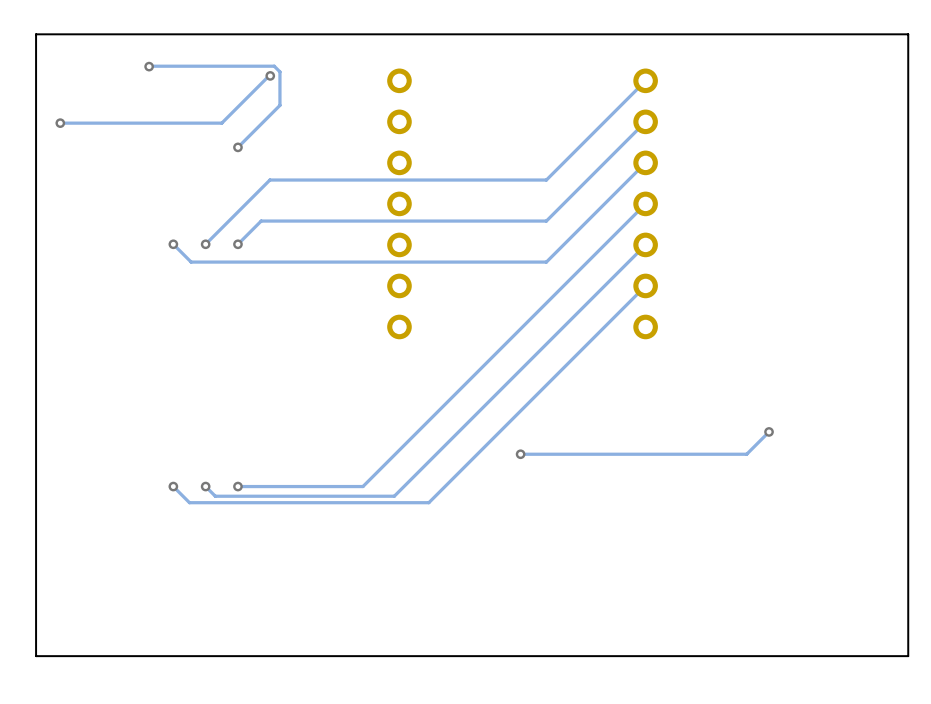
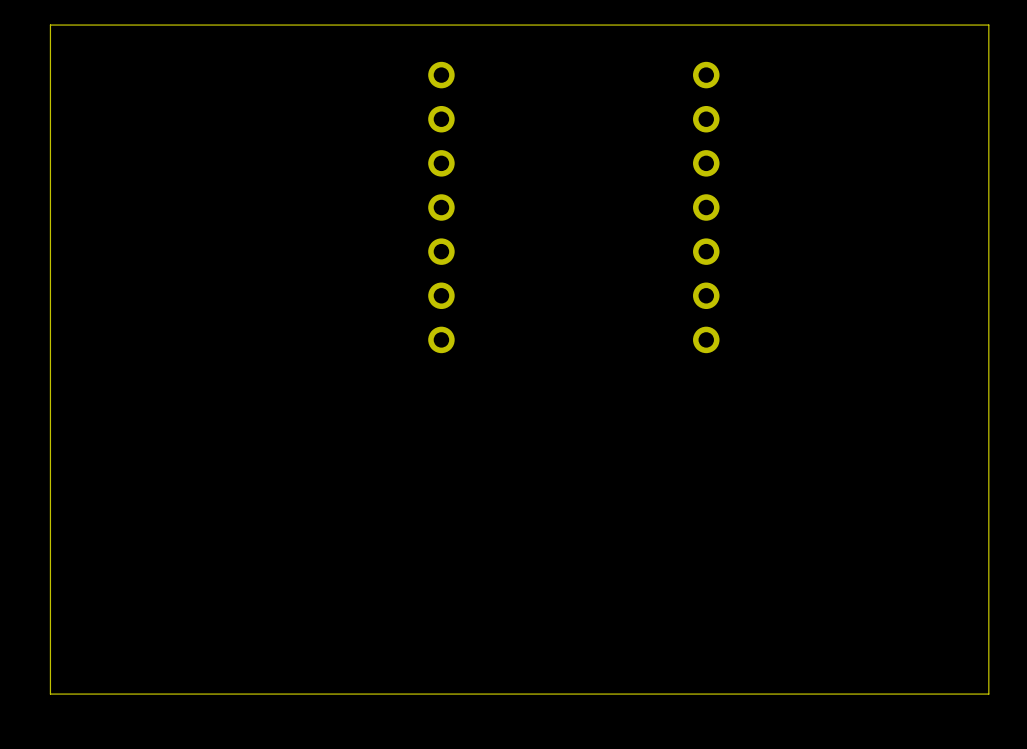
track: (149, 66) (274, 66) (279, 71) (279, 105) (237, 147) -> none
via: (149, 66) -> none
track: (270, 74) (221, 123) (60, 123) -> none
via: (270, 75) -> none
track: (645, 80) (546, 180) (269, 180) (205, 244) -> none
track: (645, 121) (546, 221) (261, 221) (237, 244) -> none
via: (60, 123) -> none
via: (237, 147) -> none
track: (645, 162) (546, 262) (191, 262) (173, 244) -> none
track: (645, 203) (362, 486) (237, 486) -> none
via: (173, 244) -> none
via: (205, 244) -> none
via: (237, 244) -> none
track: (645, 244) (394, 496) (215, 496) (205, 486) -> none
track: (645, 285) (428, 502) (189, 502) (173, 486) -> none
track: (769, 431) (746, 454) (520, 454) -> none
via: (769, 431) -> none
via: (520, 454) -> none
via: (173, 486) -> none
via: (205, 486) -> none
via: (237, 486) -> none

